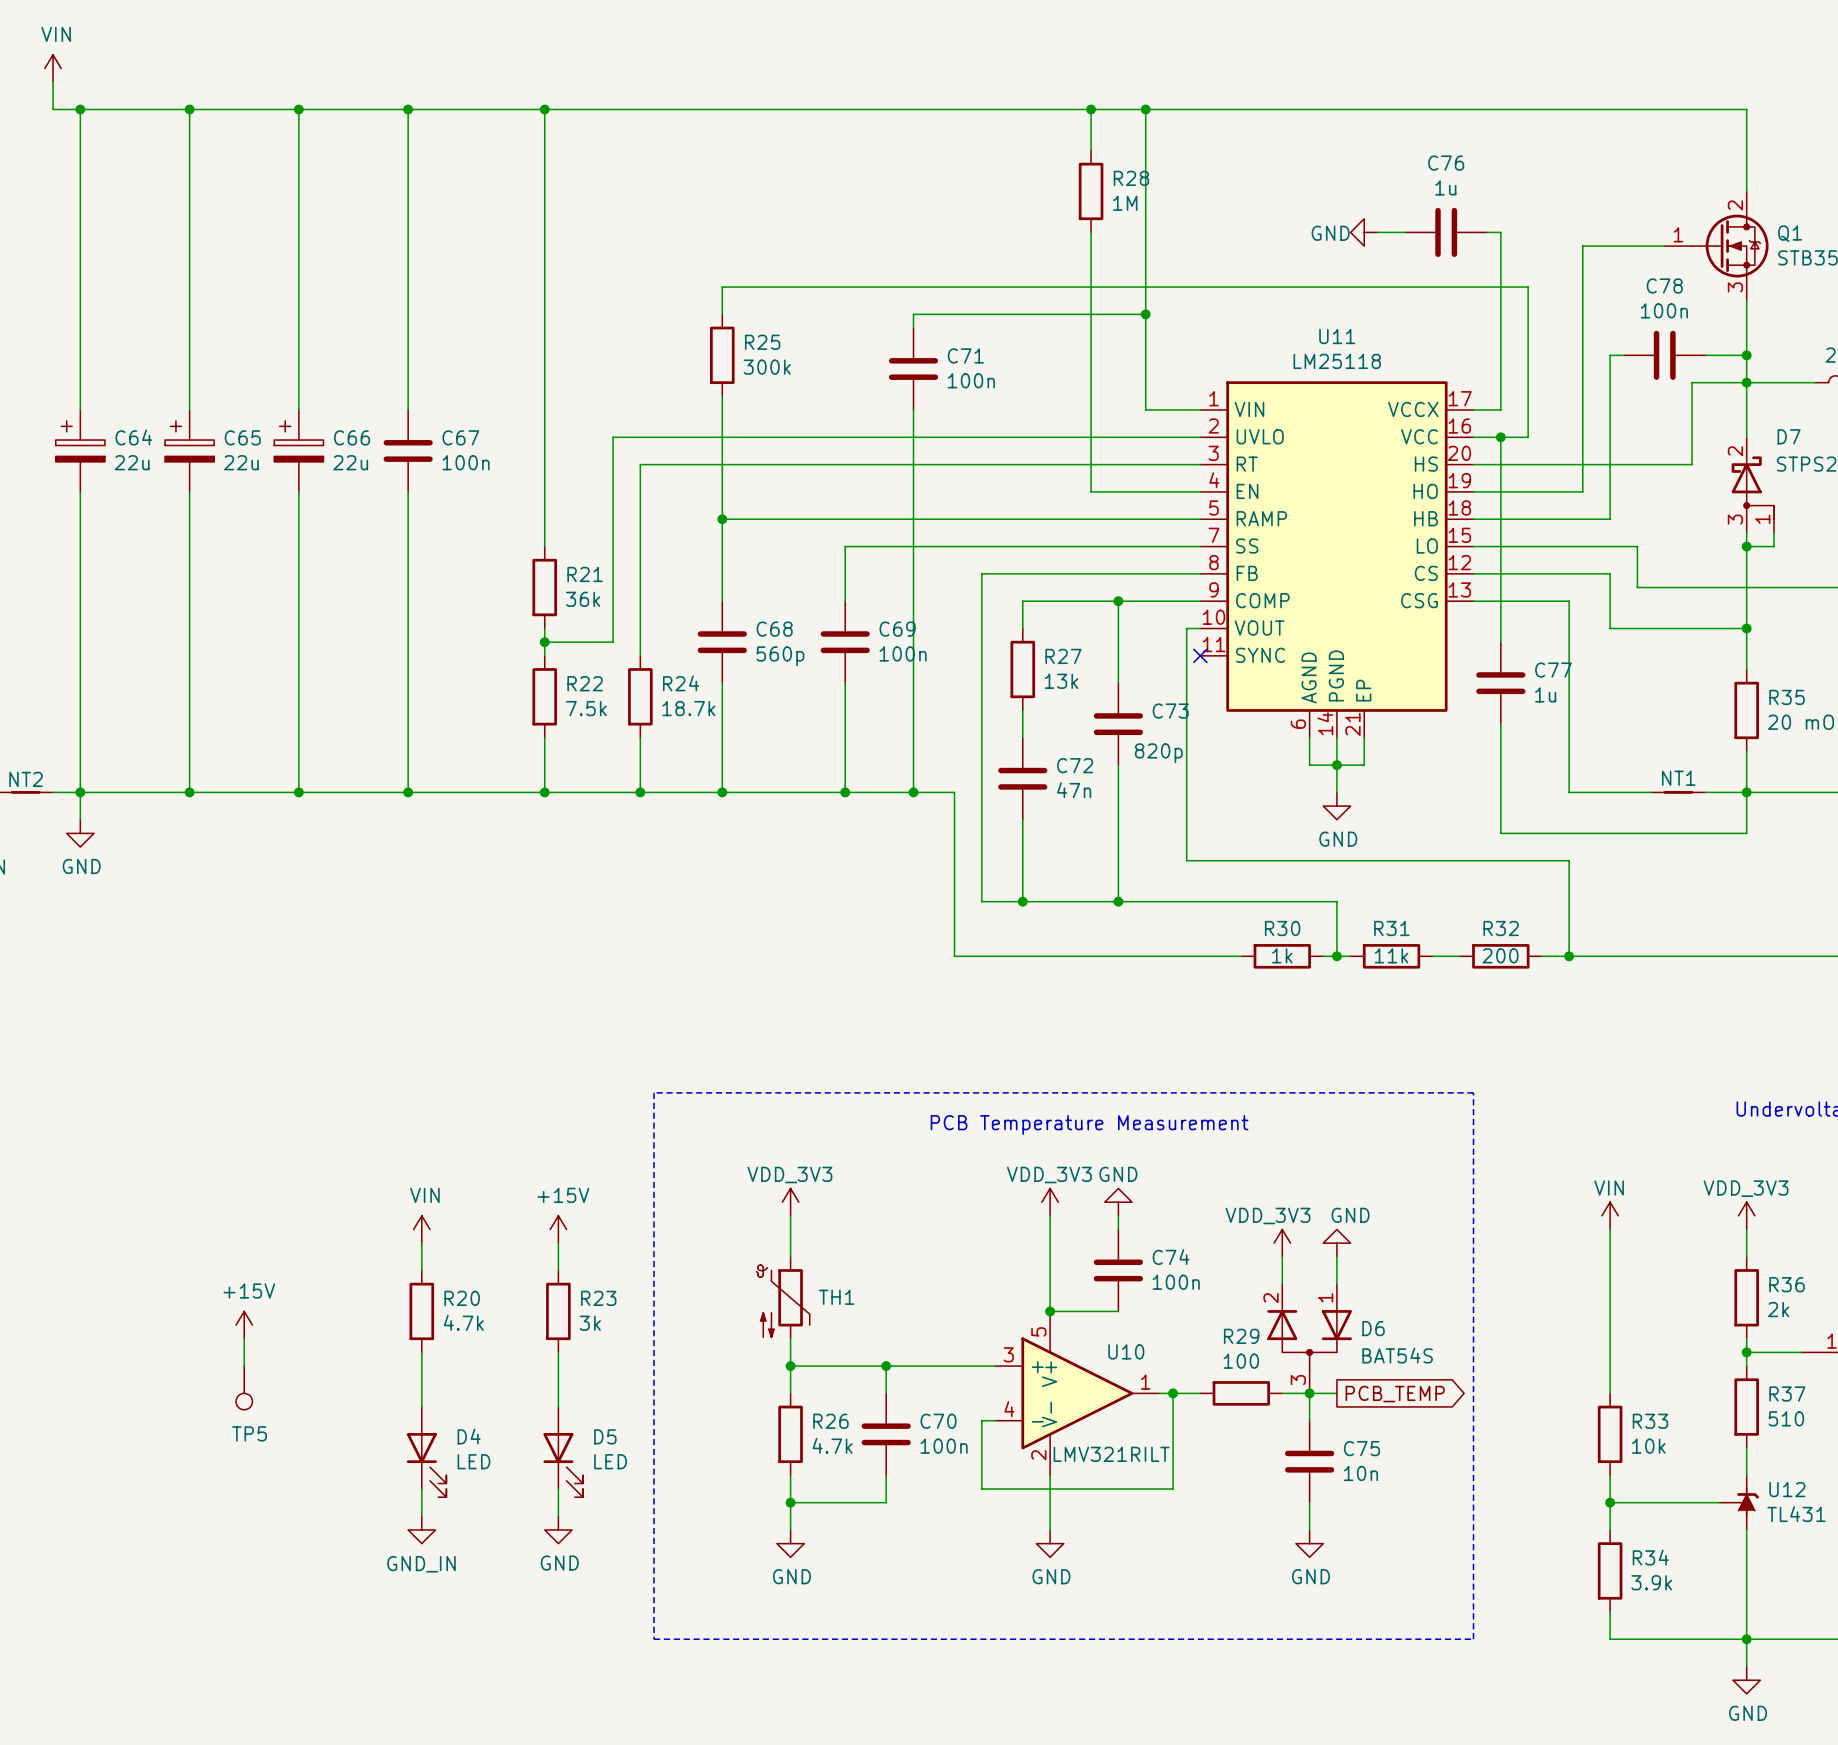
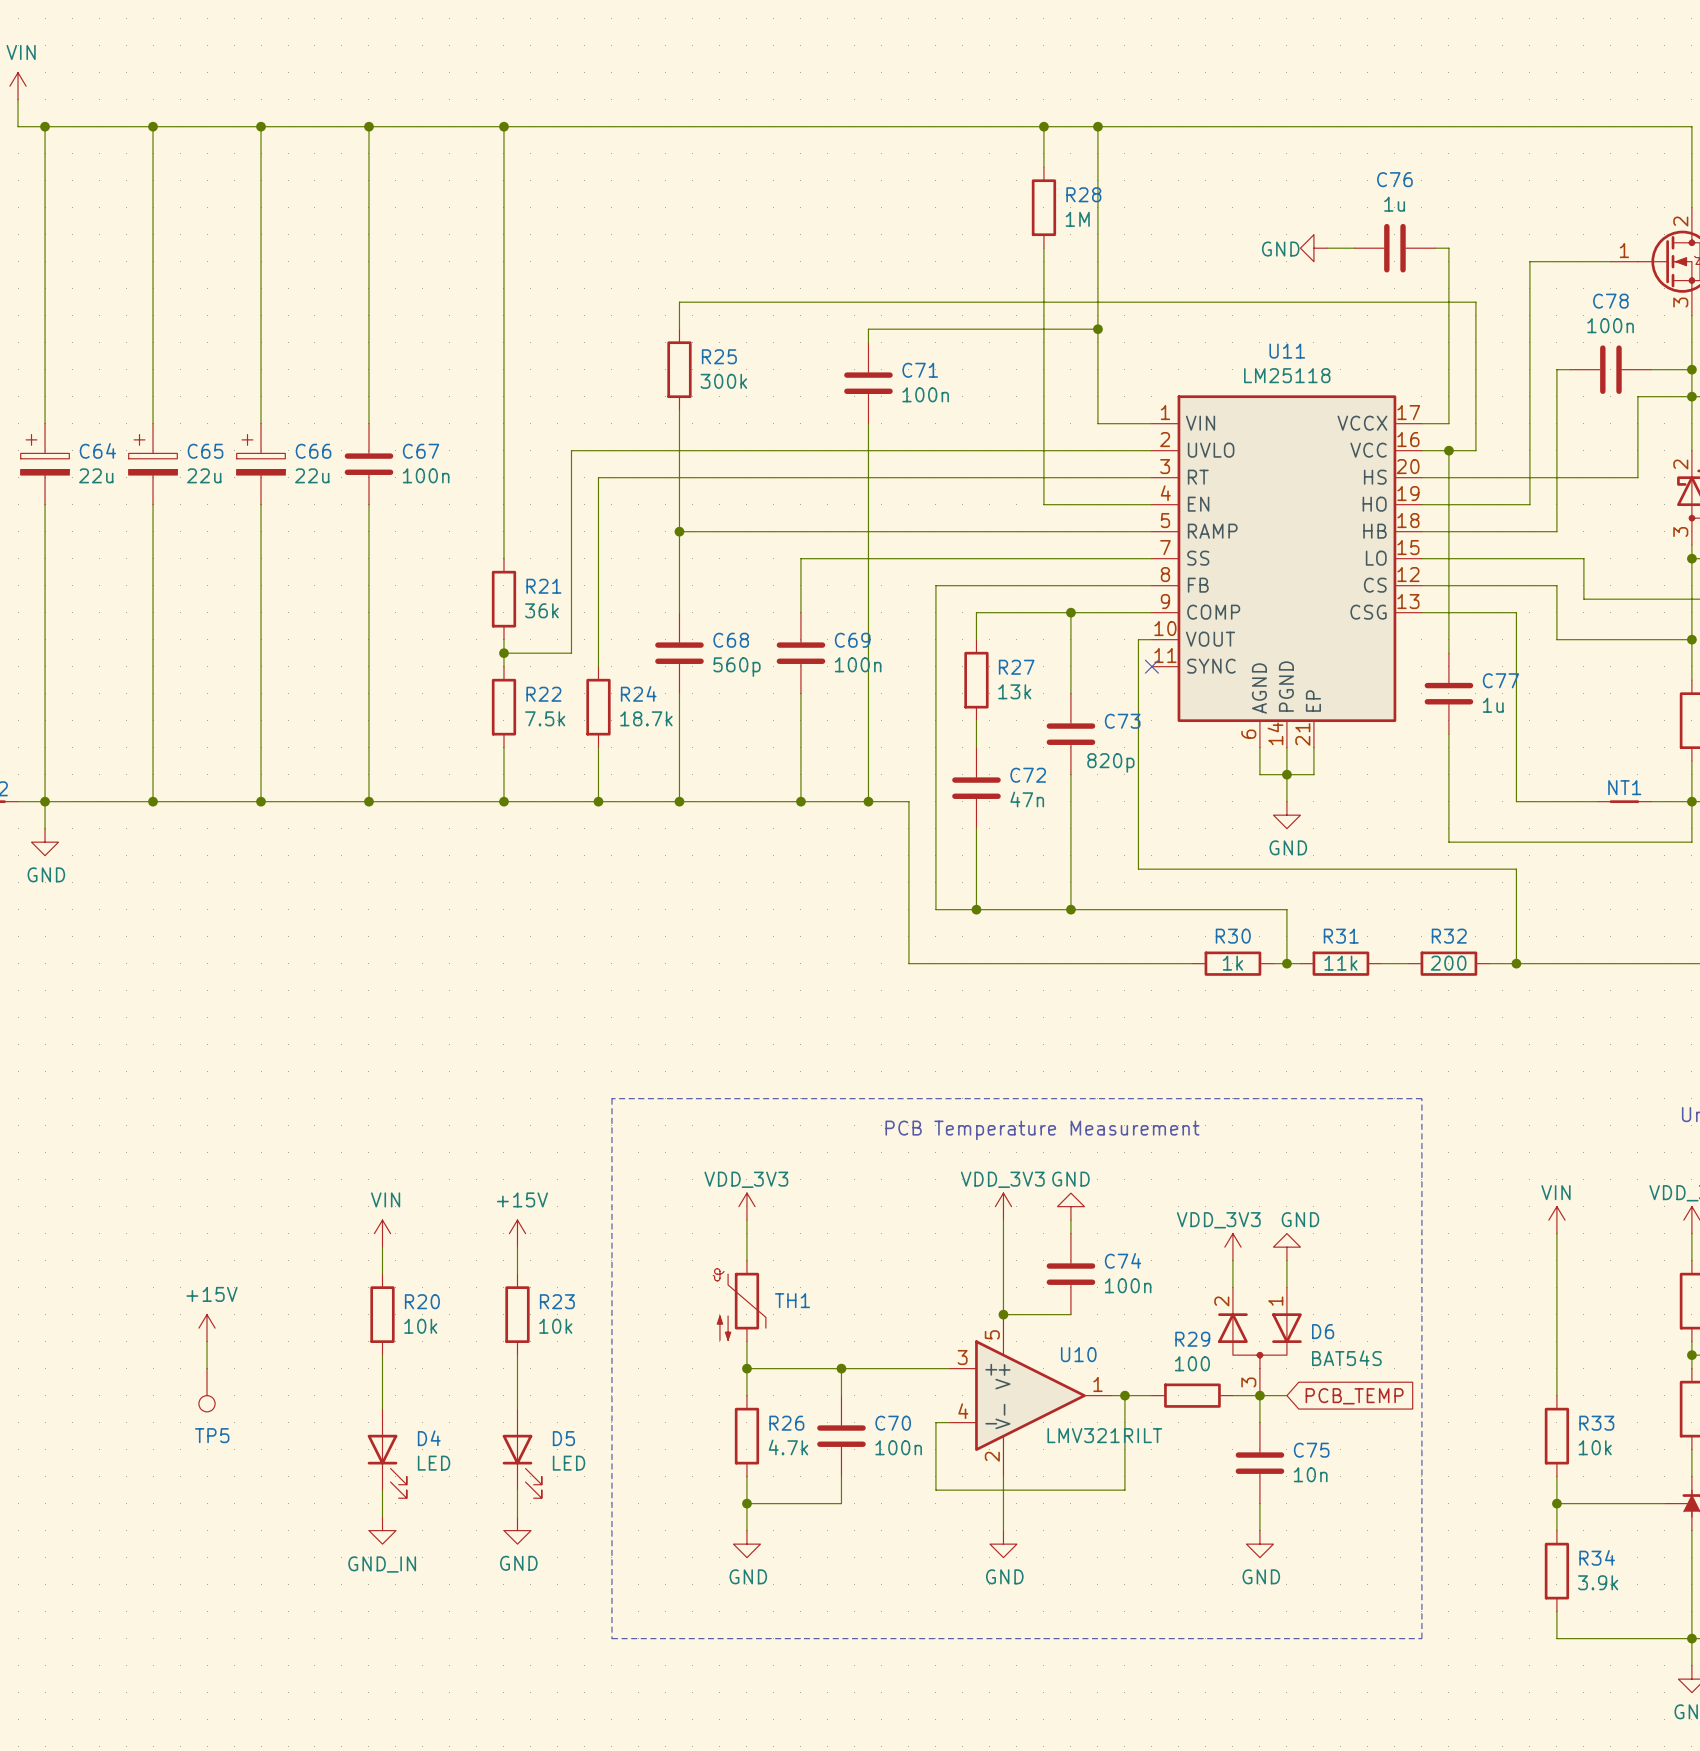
R20 value: 4.7k (463, 1322) -> 10k (420, 1326)
R23 value: 3k (590, 1323) -> 10k (555, 1326)
global label shape: output (1395, 1394) -> input (1354, 1396)
U10 value position: LMV321RILT (1111, 1454) -> LMV321RILT (1104, 1435)

